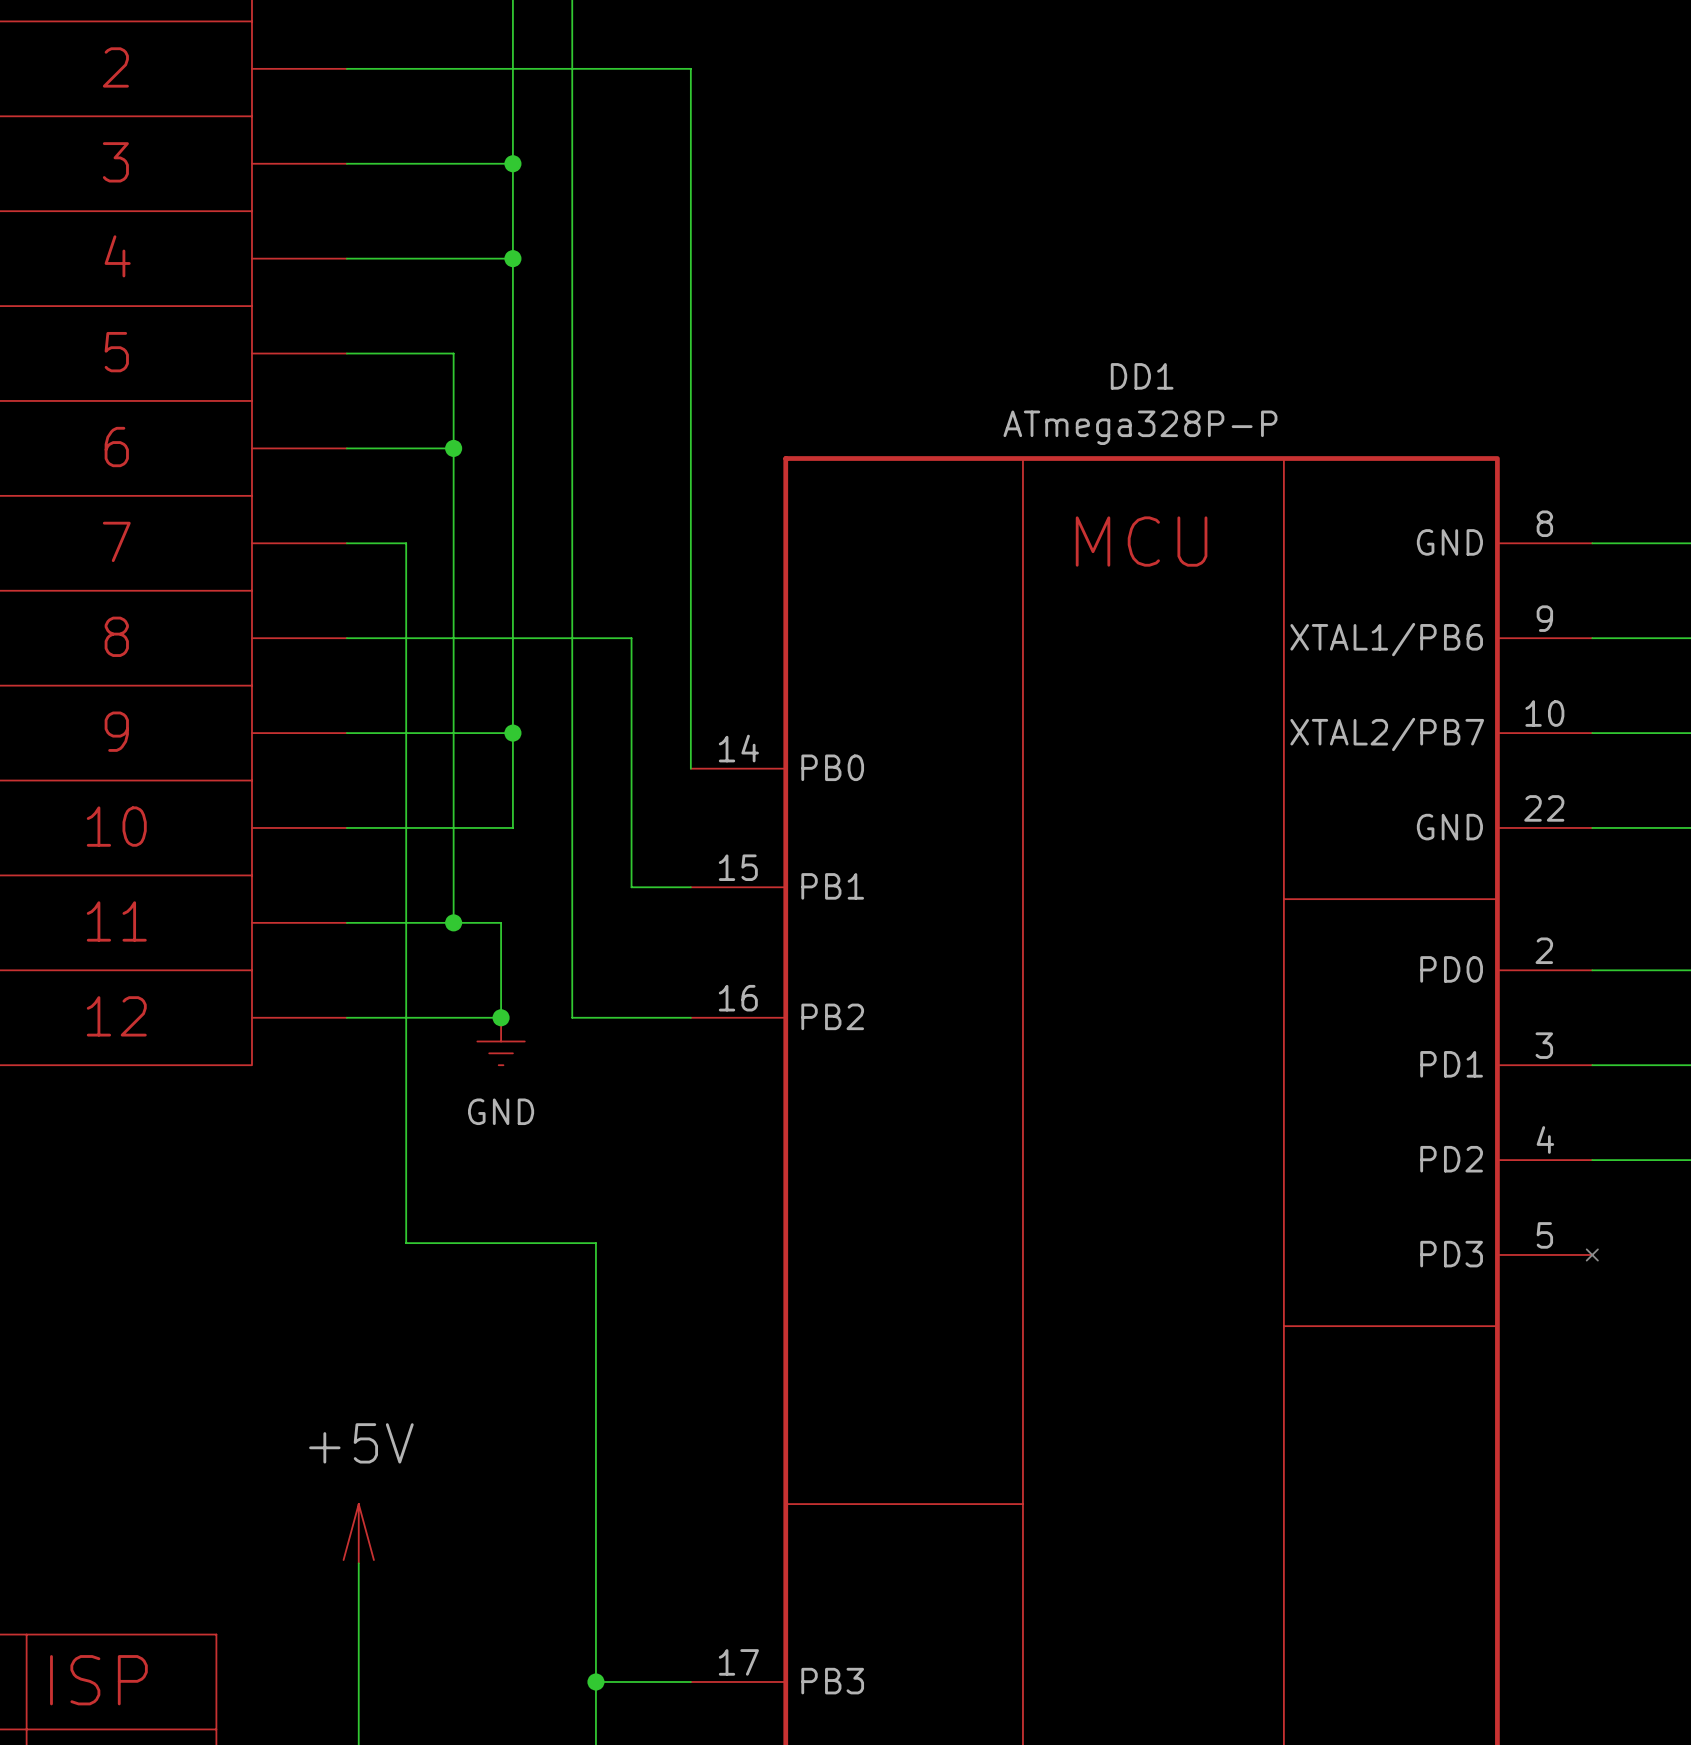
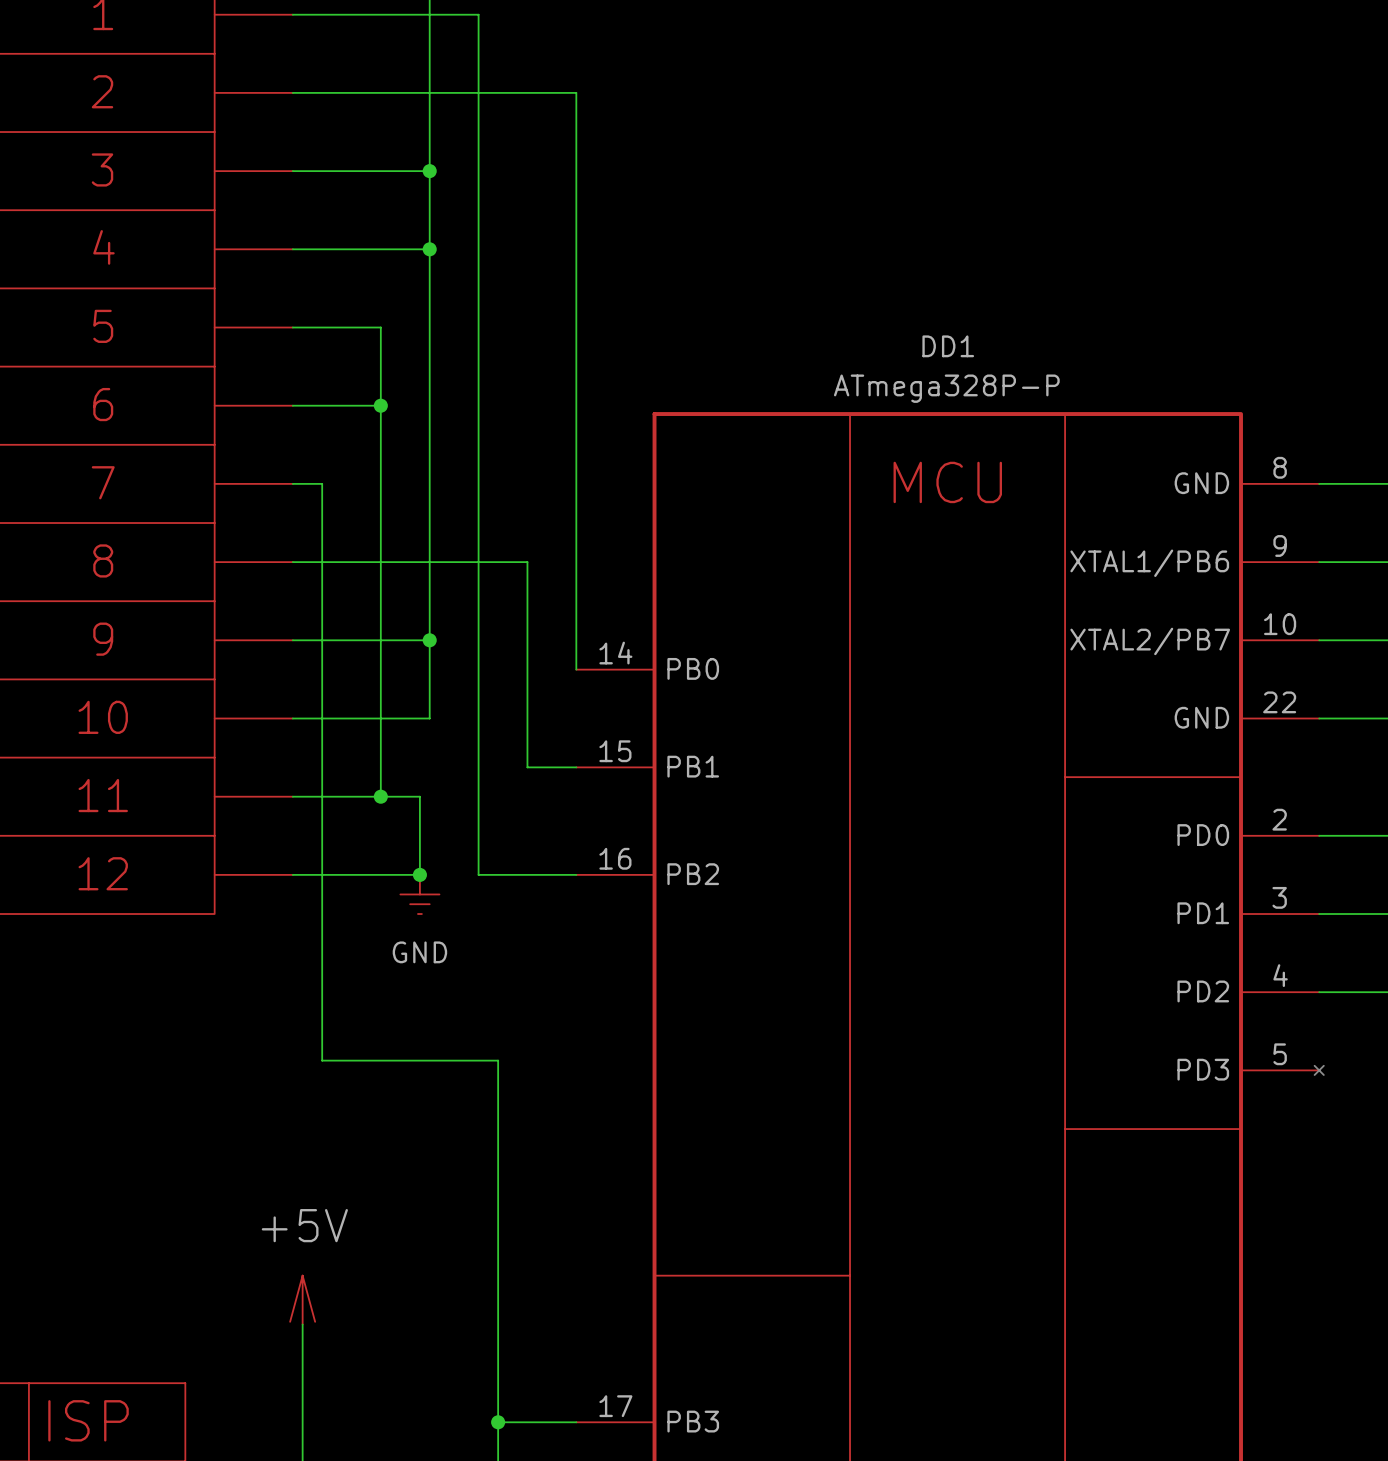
wire: (382, 543) (406, 543) (406, 1243) -> (322, 483) (322, 1060) (341, 1060)

